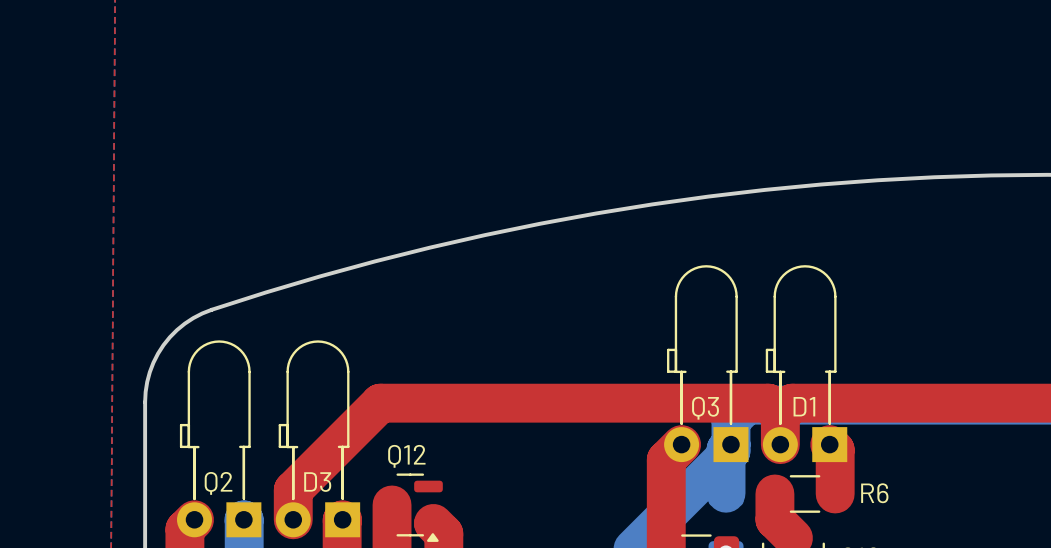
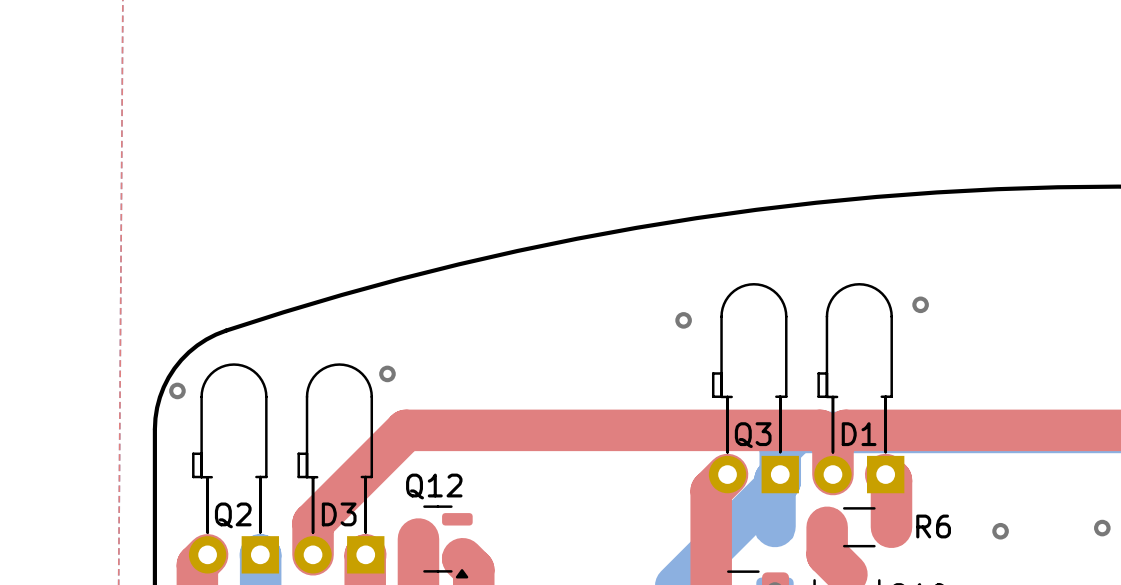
via: none -> (920, 304)
via: none -> (683, 320)
via: none -> (387, 373)
via: none -> (177, 390)
via: none -> (1102, 528)
via: none -> (1000, 531)

